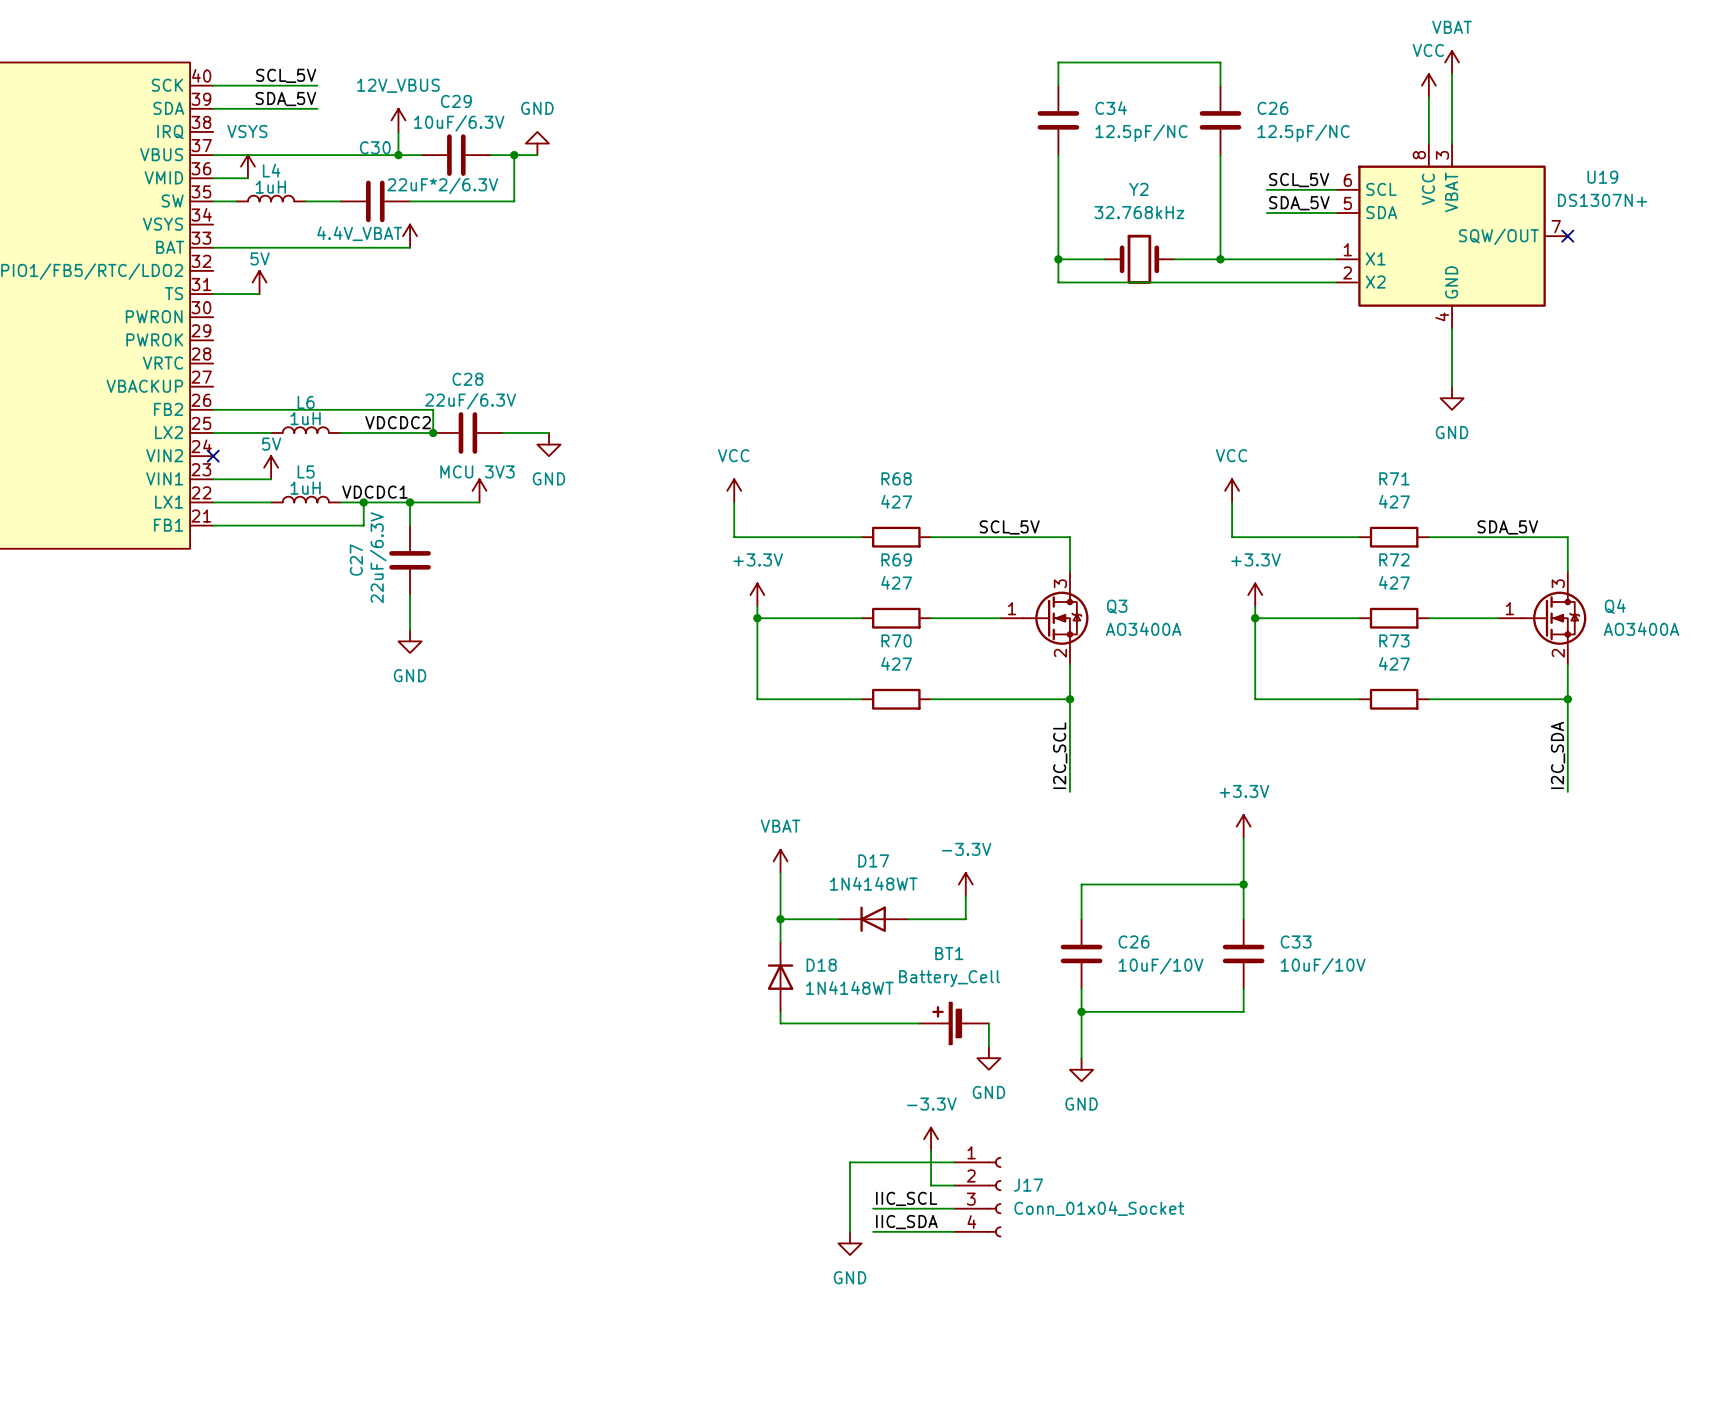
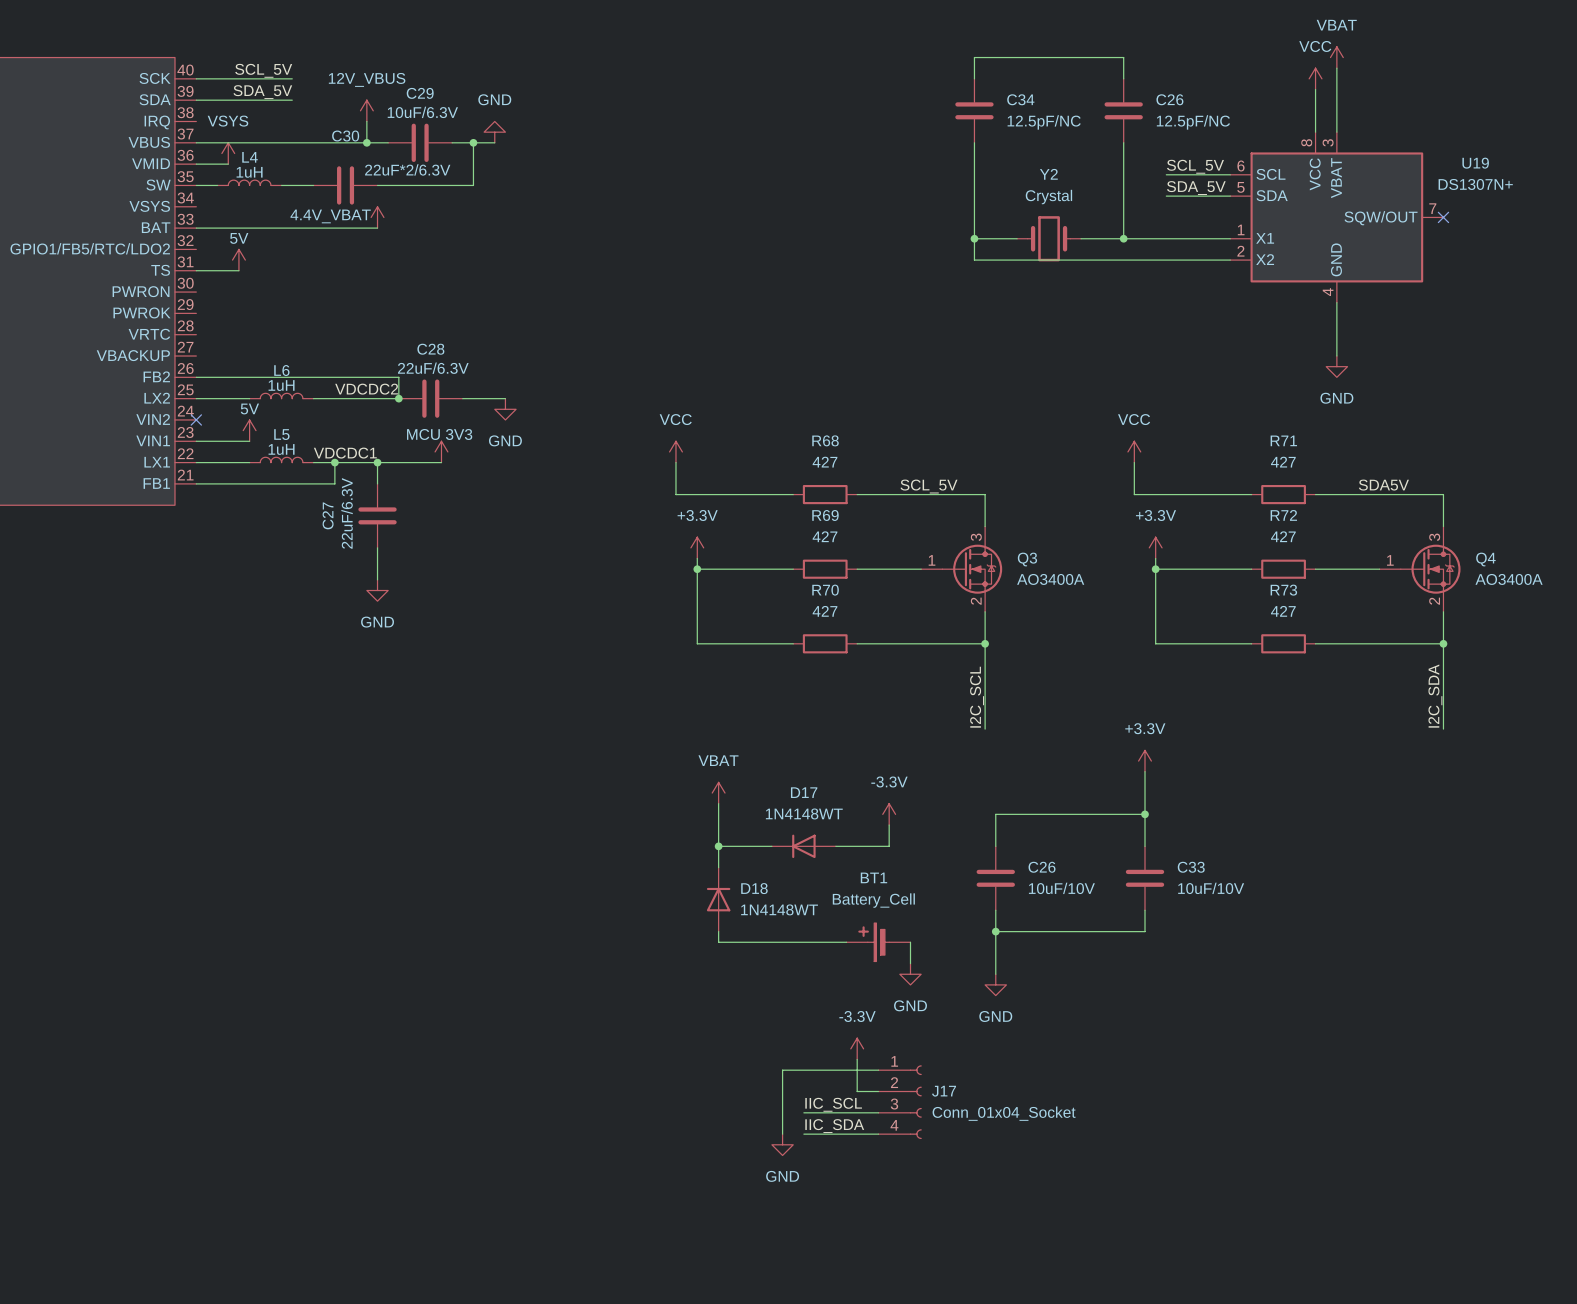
Y2 value: 32.768kHz (1139, 212) -> Crystal (1048, 197)
label: SDA_5V (1507, 527) -> SDA5V (1383, 485)

